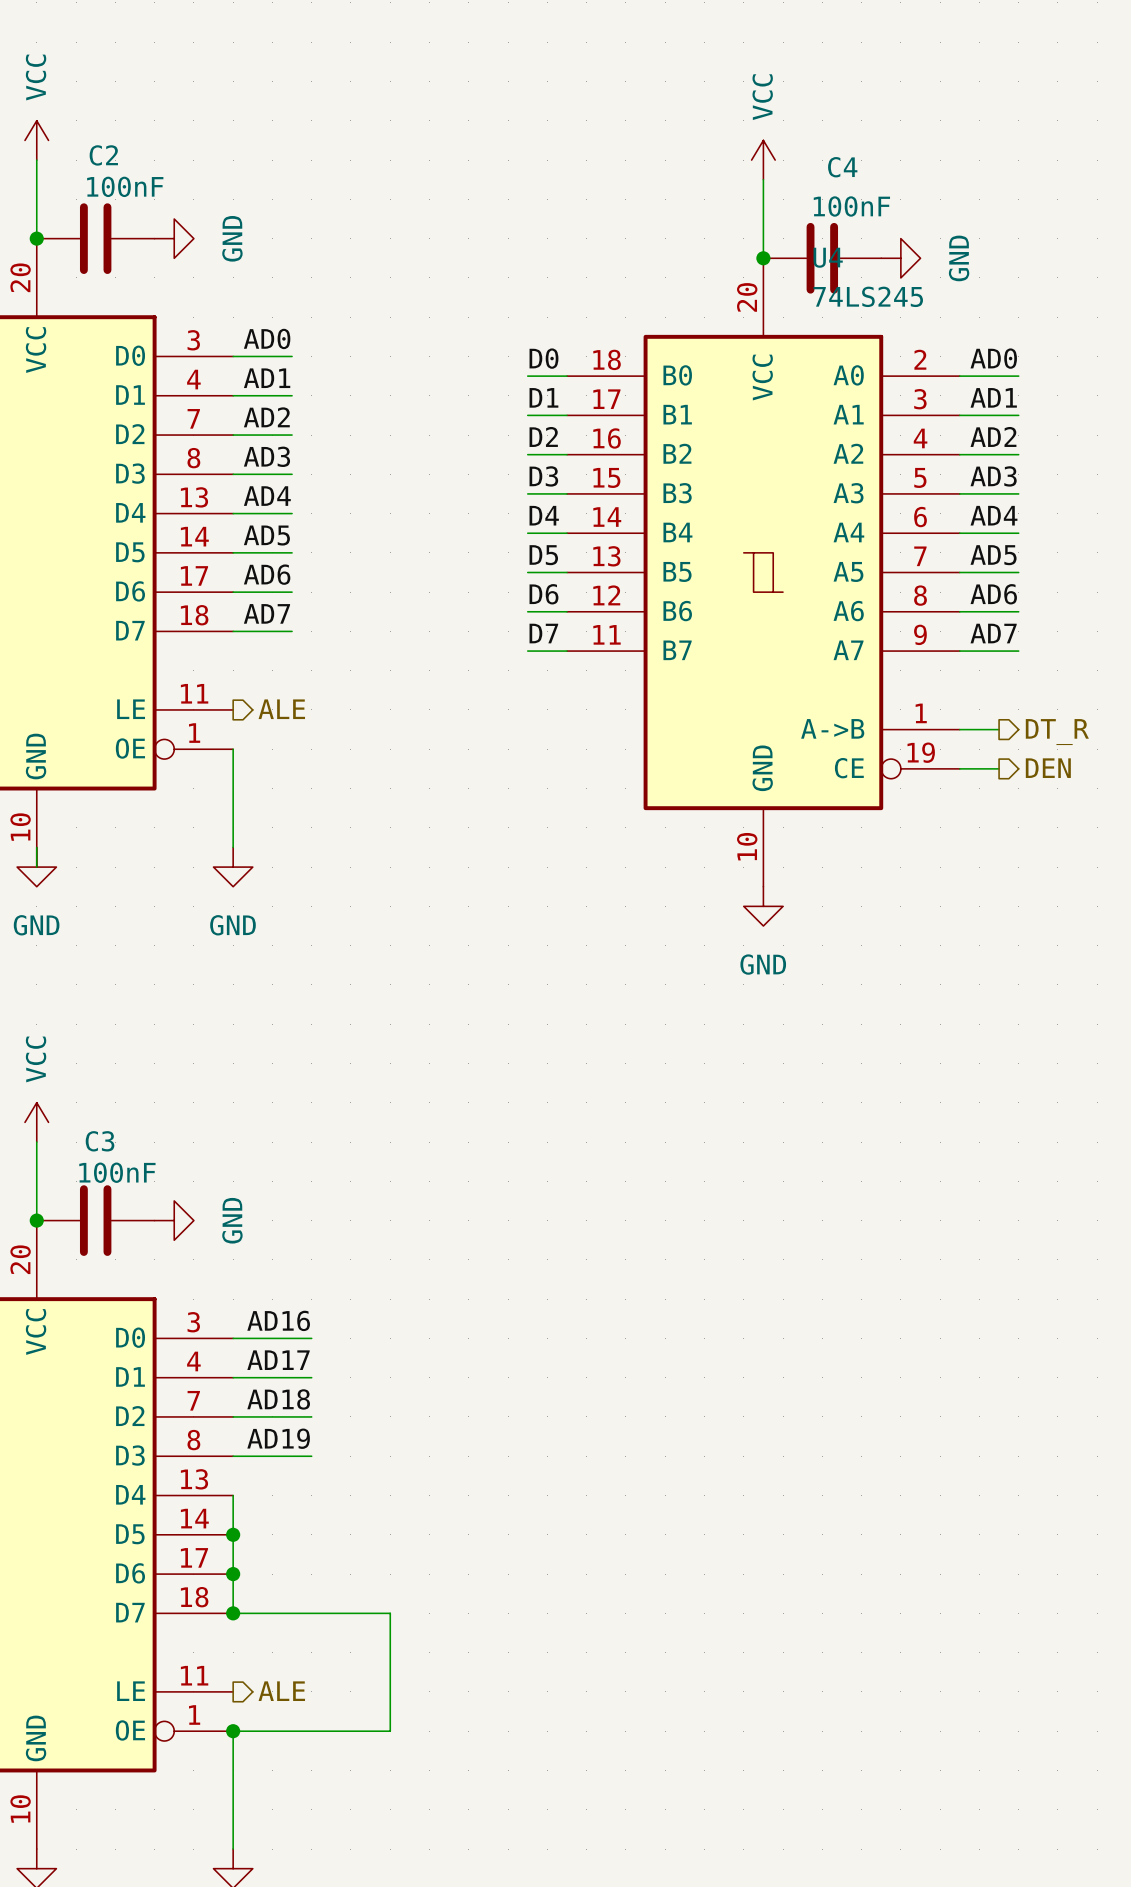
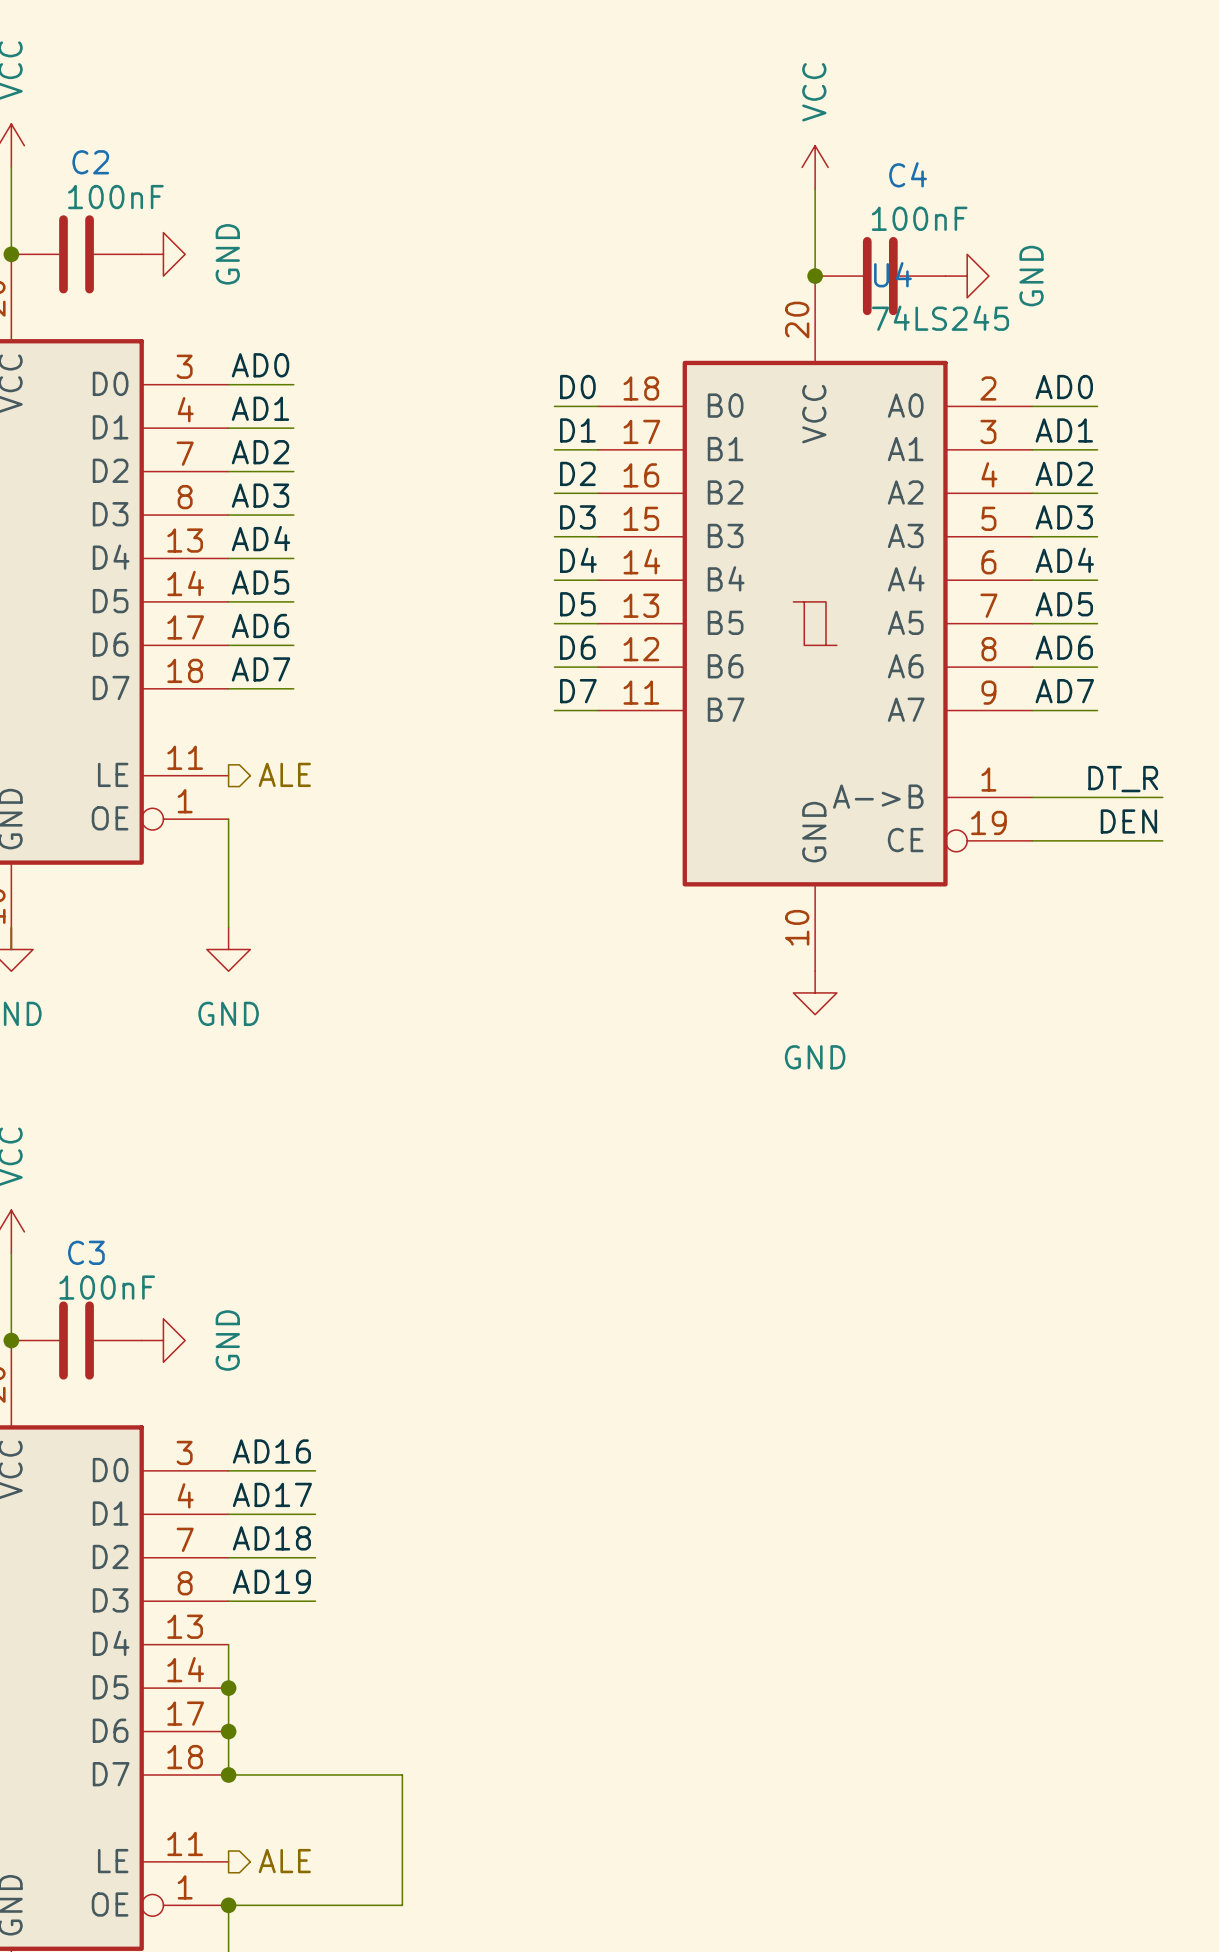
label: none -> DT_R (1123, 779)
wire: none -> (1075, 797) (1162, 797)
hierarchical label: DT_R (1057, 732) -> none
label: none -> DEN (1128, 821)
wire: none -> (1075, 840) (1162, 840)
hierarchical label: DEN (1048, 768) -> none

